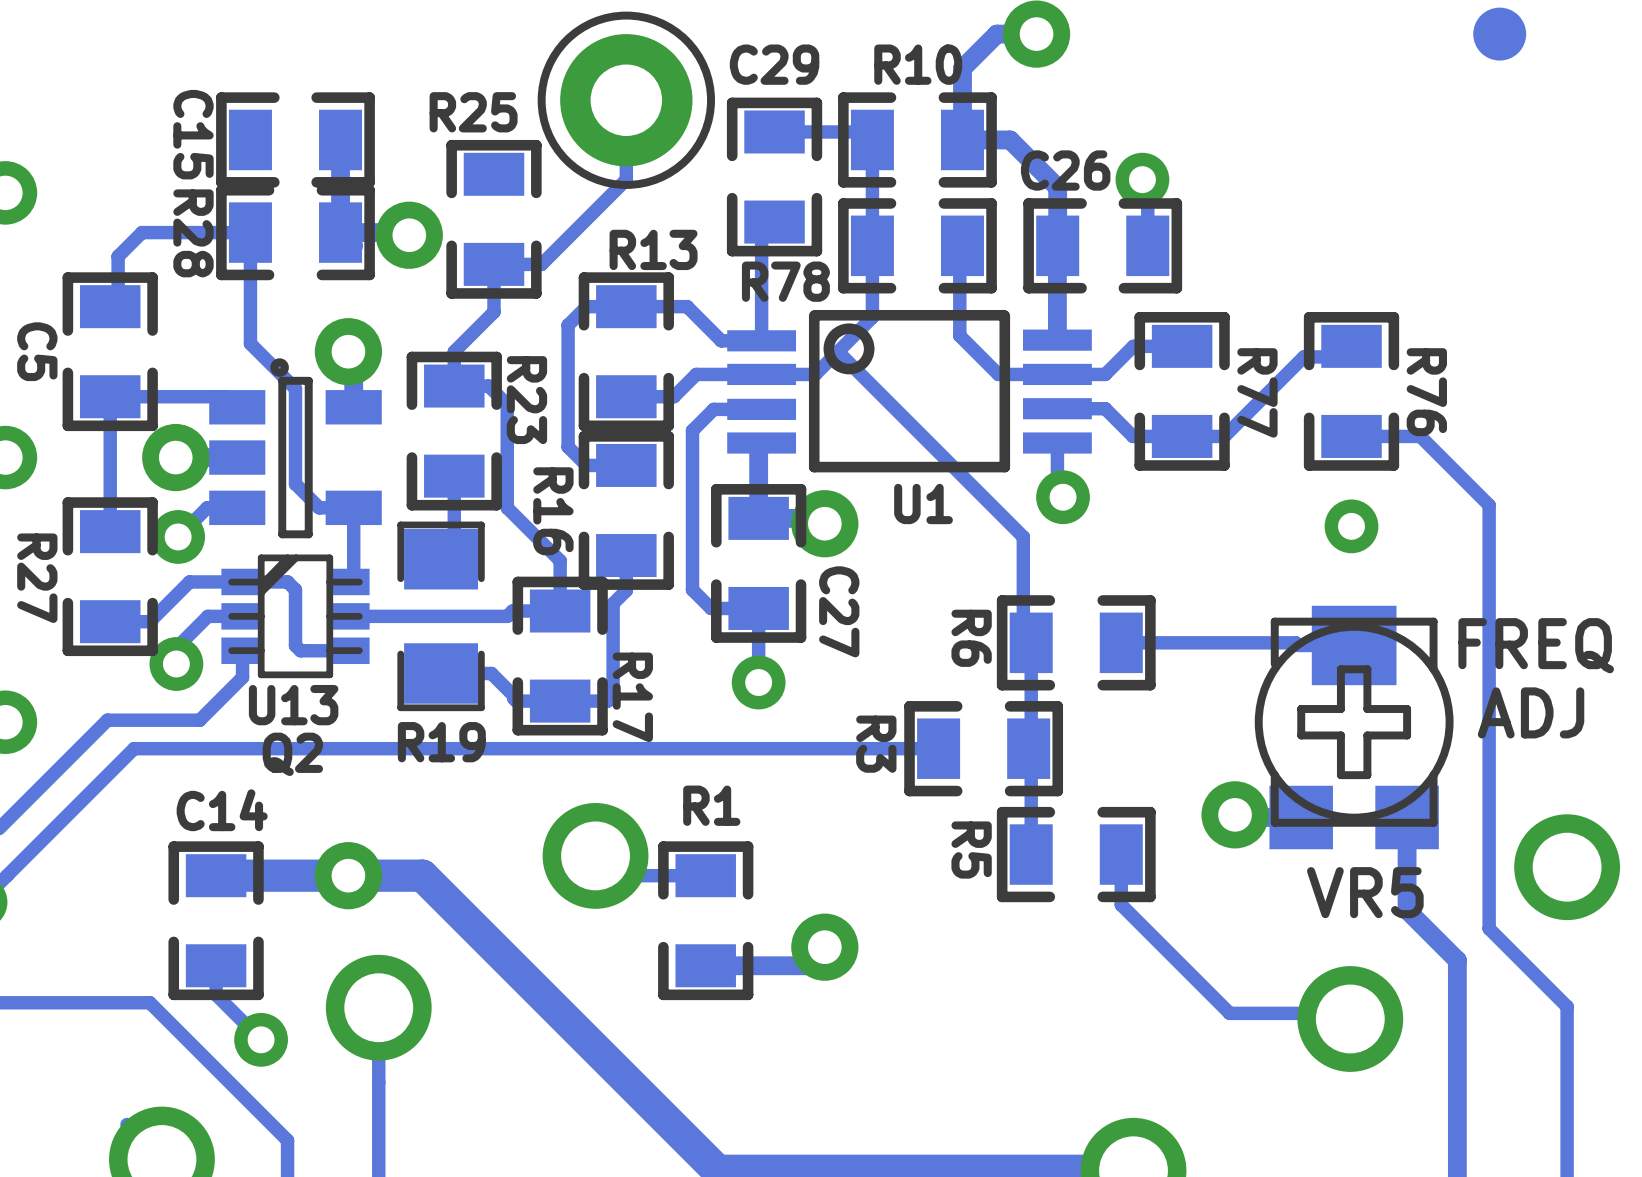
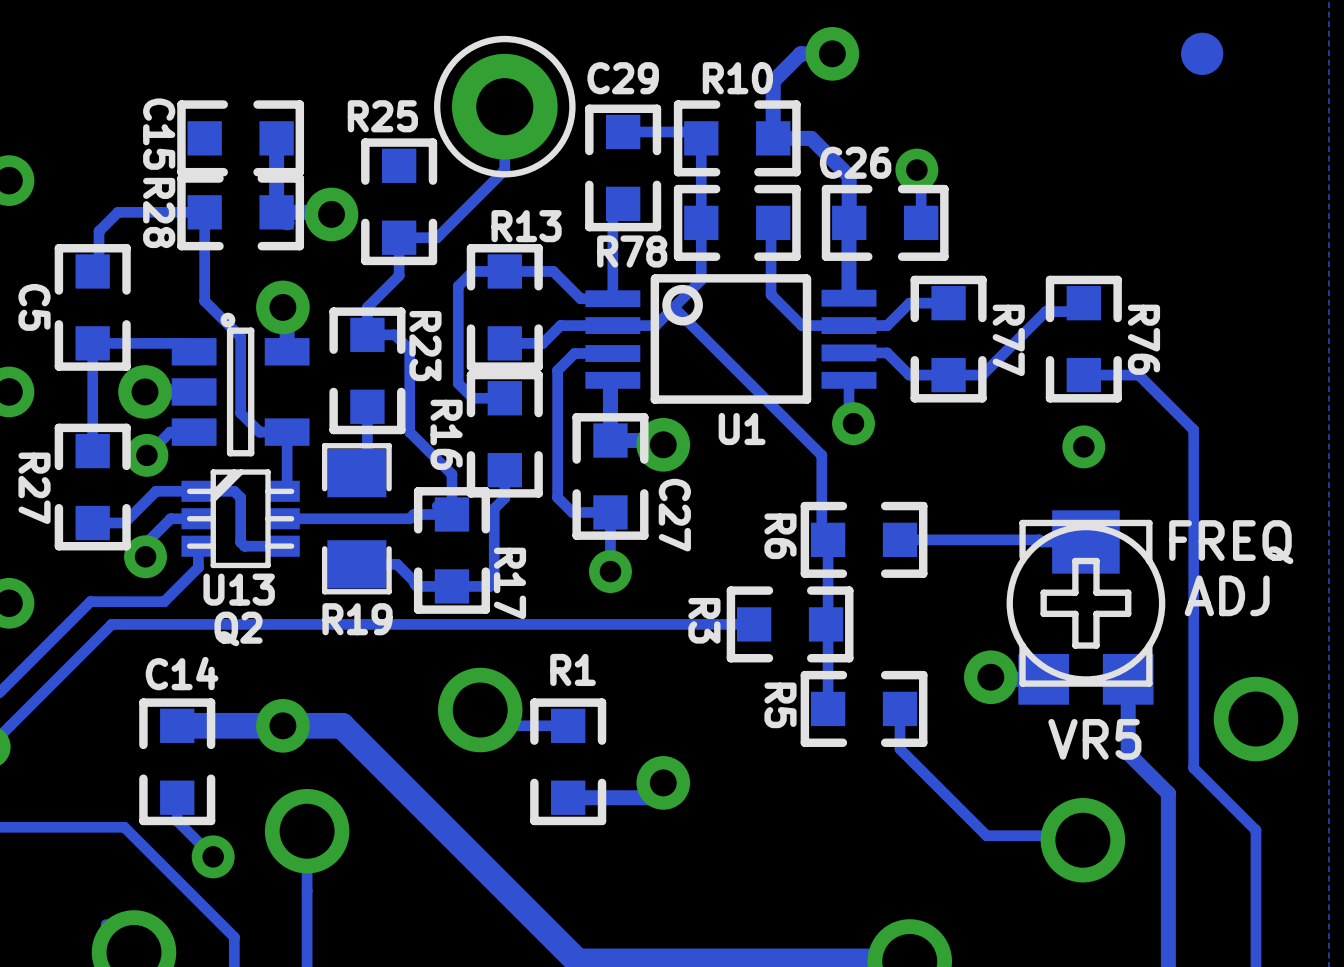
C15 footprint: [216, 92, 375, 188] -> [177, 100, 305, 177]
R10 footprint: [838, 92, 997, 188] -> [673, 100, 801, 177]
C29 footprint: [726, 97, 823, 257] -> [585, 104, 662, 232]
R25 footprint: [446, 139, 542, 299] -> [361, 138, 438, 266]
R28 footprint: [216, 184, 375, 281] -> [177, 174, 305, 251]
R78 footprint: [838, 198, 997, 294] -> [673, 184, 801, 261]
C26 footprint: [1023, 198, 1183, 294] -> [821, 184, 949, 261]
C5 footprint: [62, 272, 158, 432] -> [54, 244, 131, 371]
R13 footprint: [578, 272, 674, 432] -> [466, 244, 543, 371]
R77 footprint: [1134, 311, 1230, 471] -> [910, 275, 987, 403]
R76 footprint: [1303, 311, 1400, 471] -> [1045, 275, 1122, 403]
R23 footprint: [406, 351, 502, 511] -> [329, 307, 406, 435]
R16 footprint: [578, 431, 674, 590] -> [466, 370, 543, 498]
C27 footprint: [711, 484, 807, 643] -> [572, 413, 649, 540]
R27 footprint: [62, 497, 158, 657] -> [54, 423, 131, 551]
R17 footprint: [512, 576, 608, 736] -> [413, 487, 491, 614]
R6 footprint: [996, 595, 1156, 691] -> [800, 501, 928, 578]
R3 footprint: [904, 701, 1064, 797] -> [726, 586, 854, 663]
R5 footprint: [996, 806, 1156, 903] -> [800, 670, 928, 747]
C14 footprint: [168, 841, 264, 1001] -> [139, 698, 216, 826]
R1 footprint: [658, 841, 754, 1001] -> [530, 698, 607, 826]

